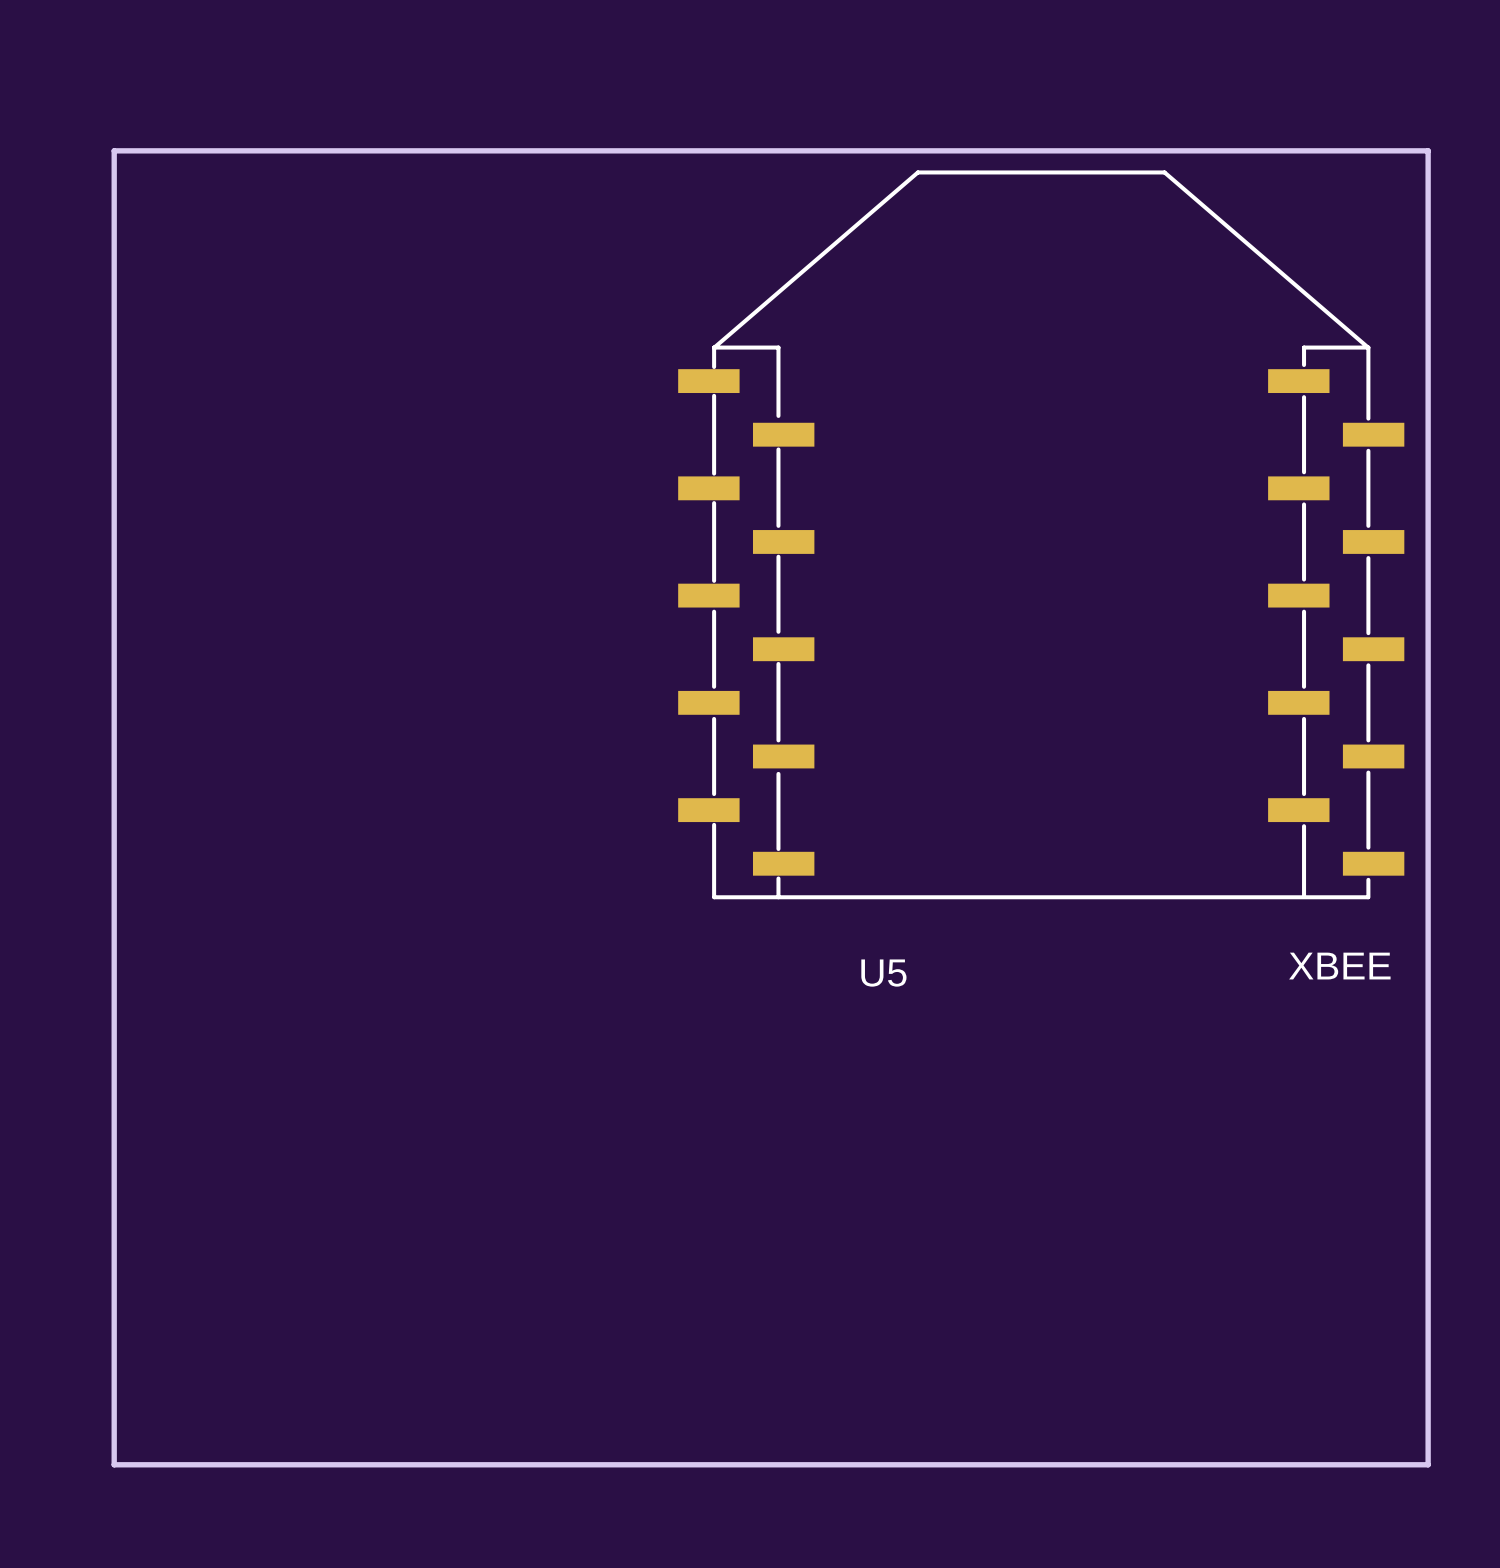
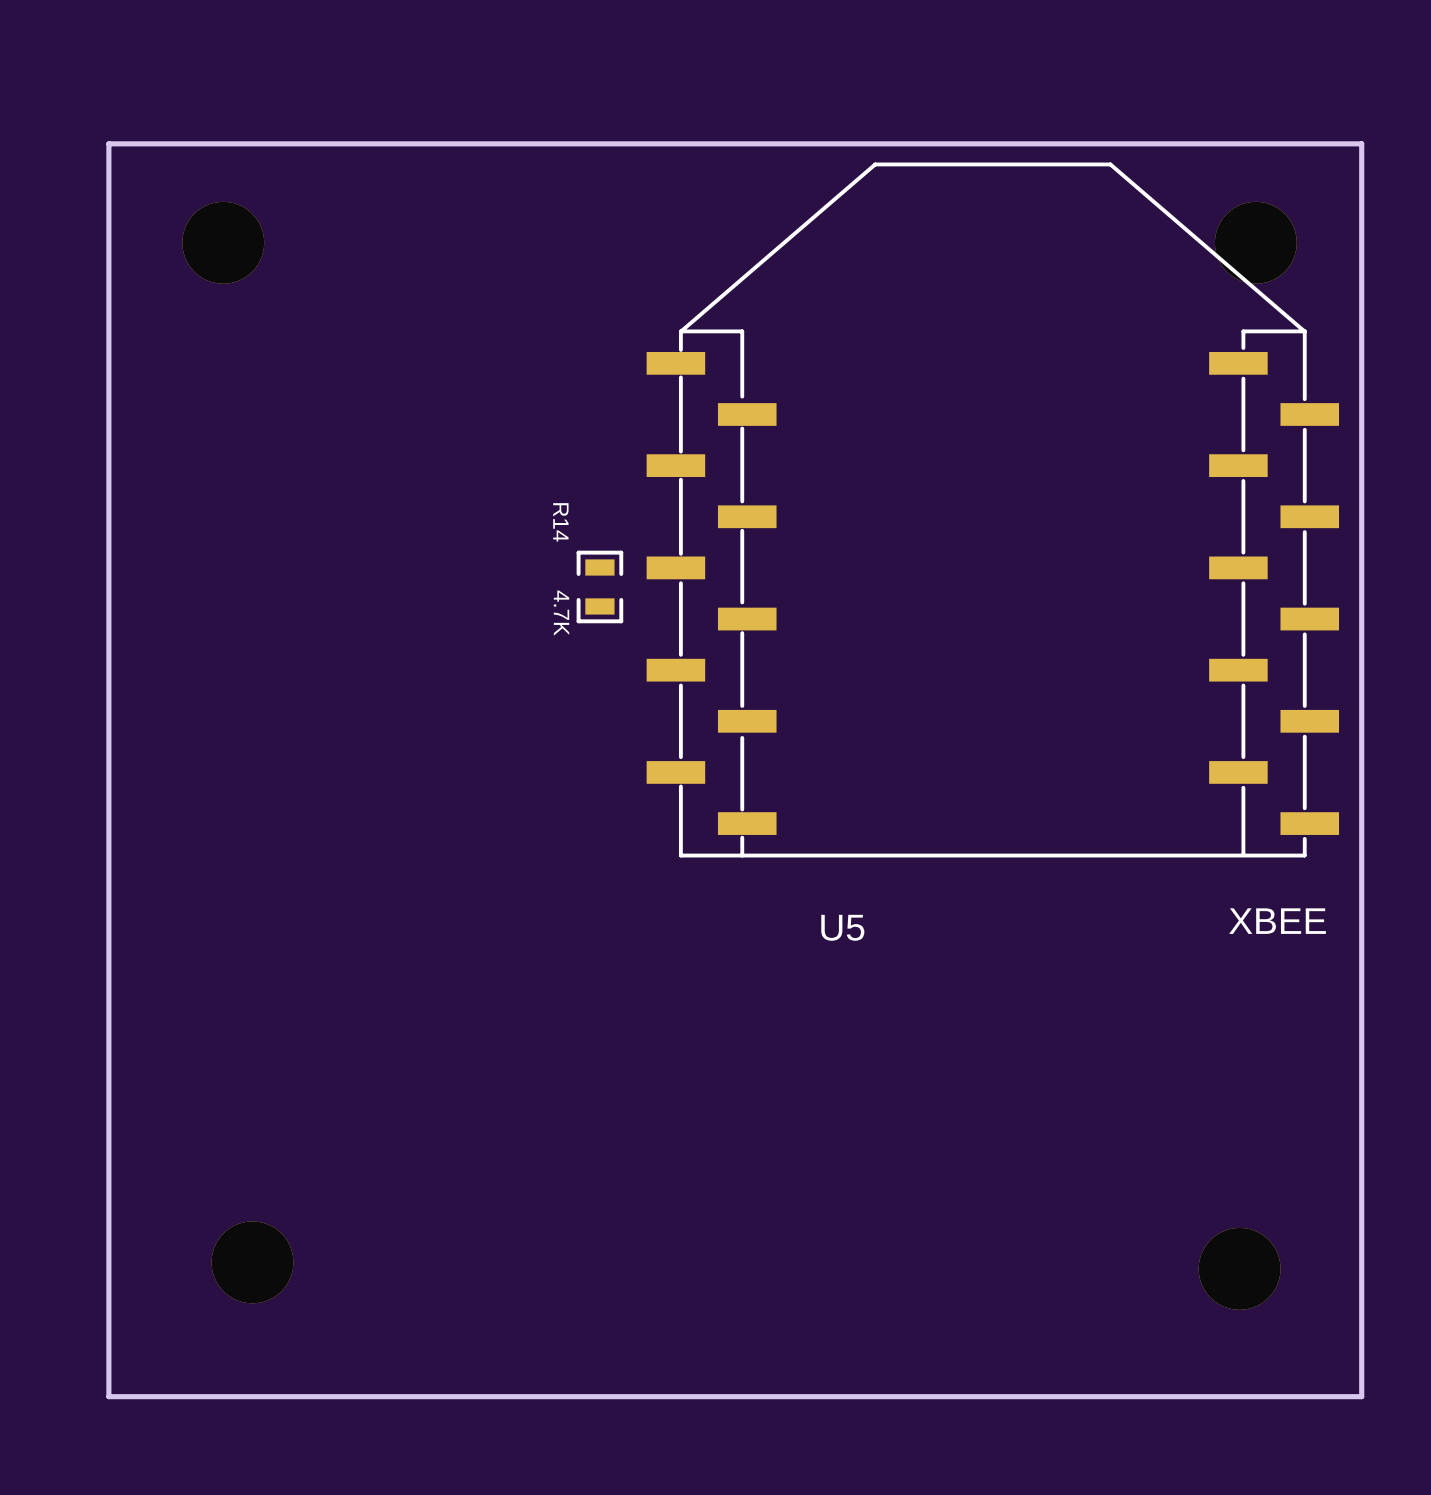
part: none -> (223, 242)
part: none -> (1255, 242)
R14: none -> 4.7K (599, 586)
part: none -> (252, 1262)
part: none -> (1239, 1268)

